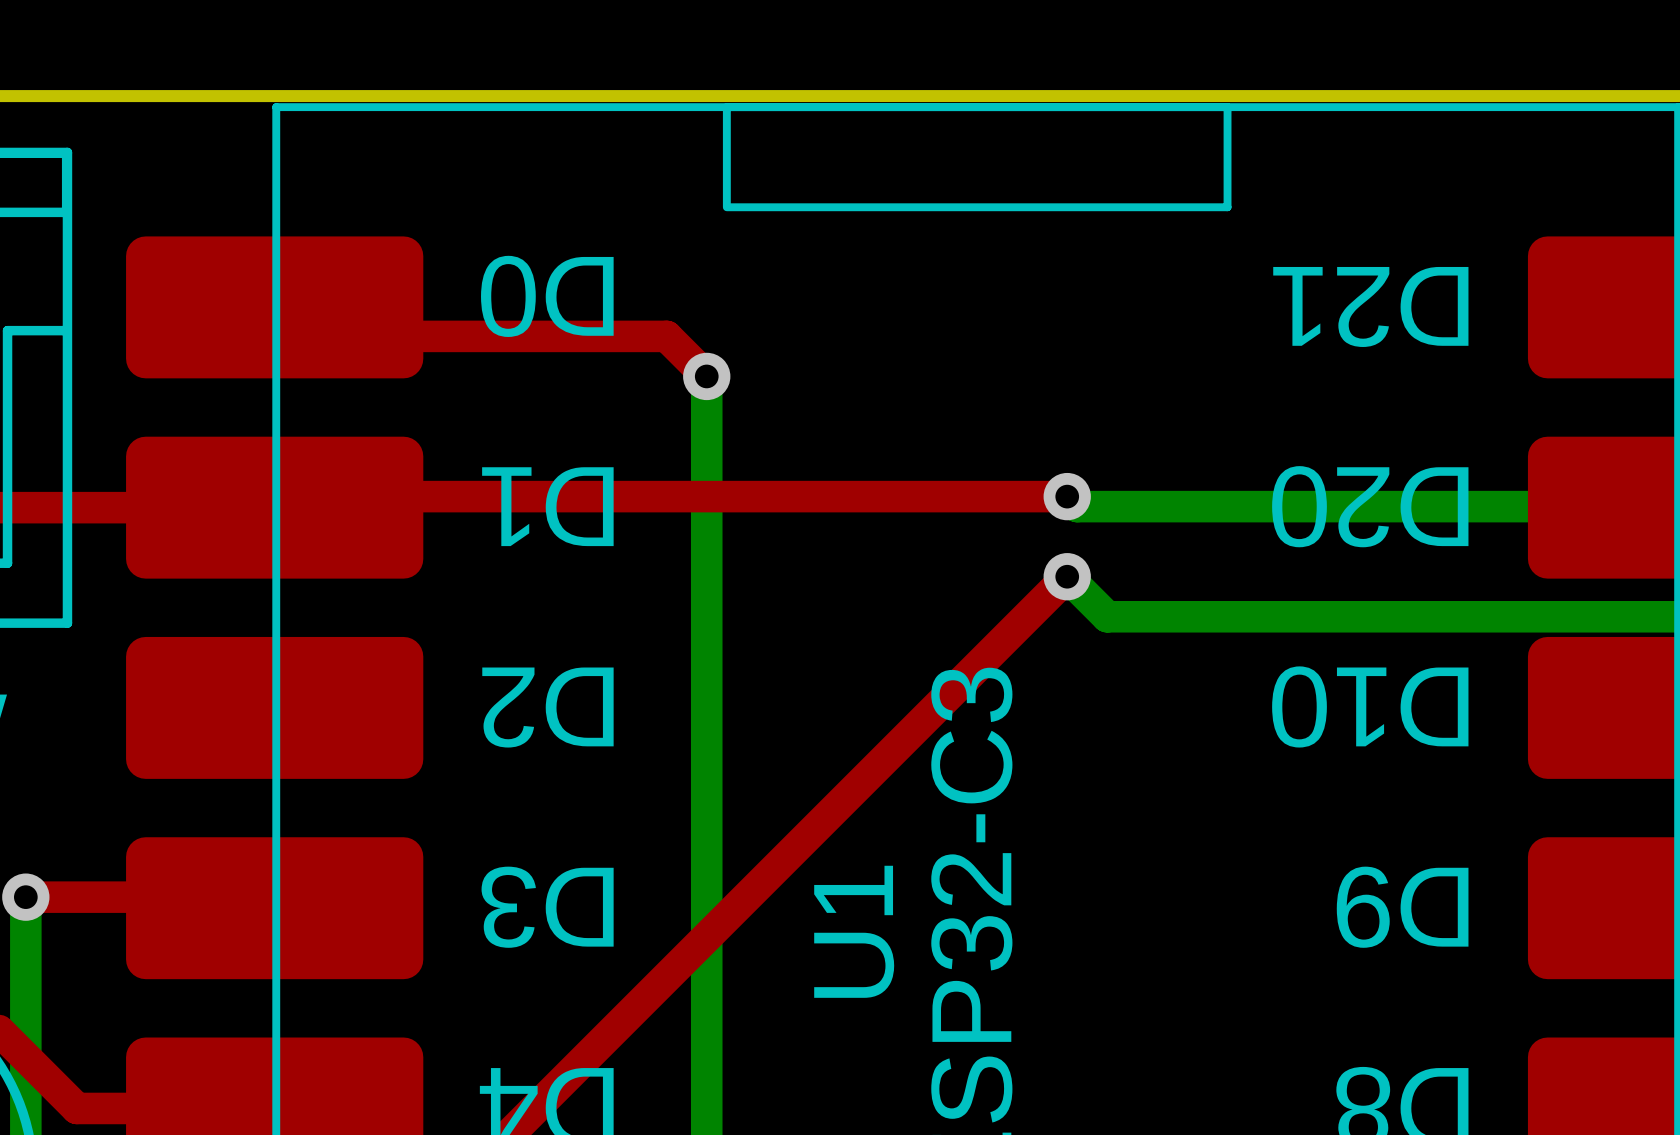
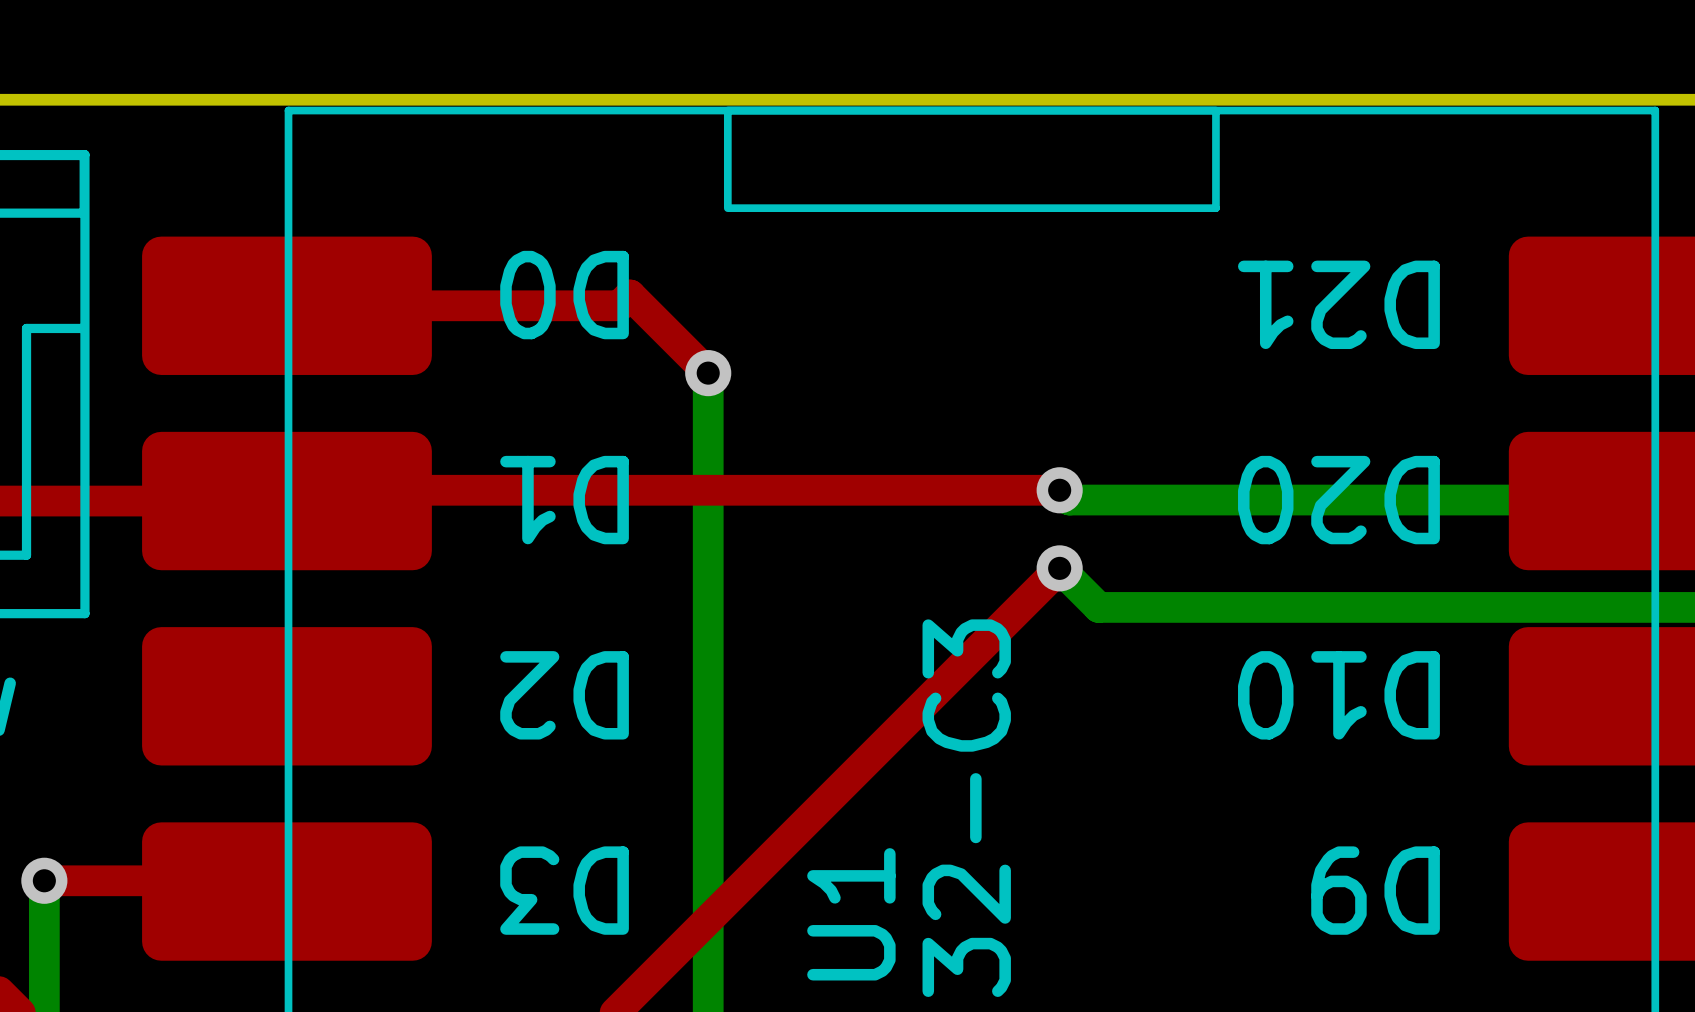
top track: (226, 307) (255, 336) (666, 336) -> (239, 305) (619, 305) (630, 295) (669, 334)

